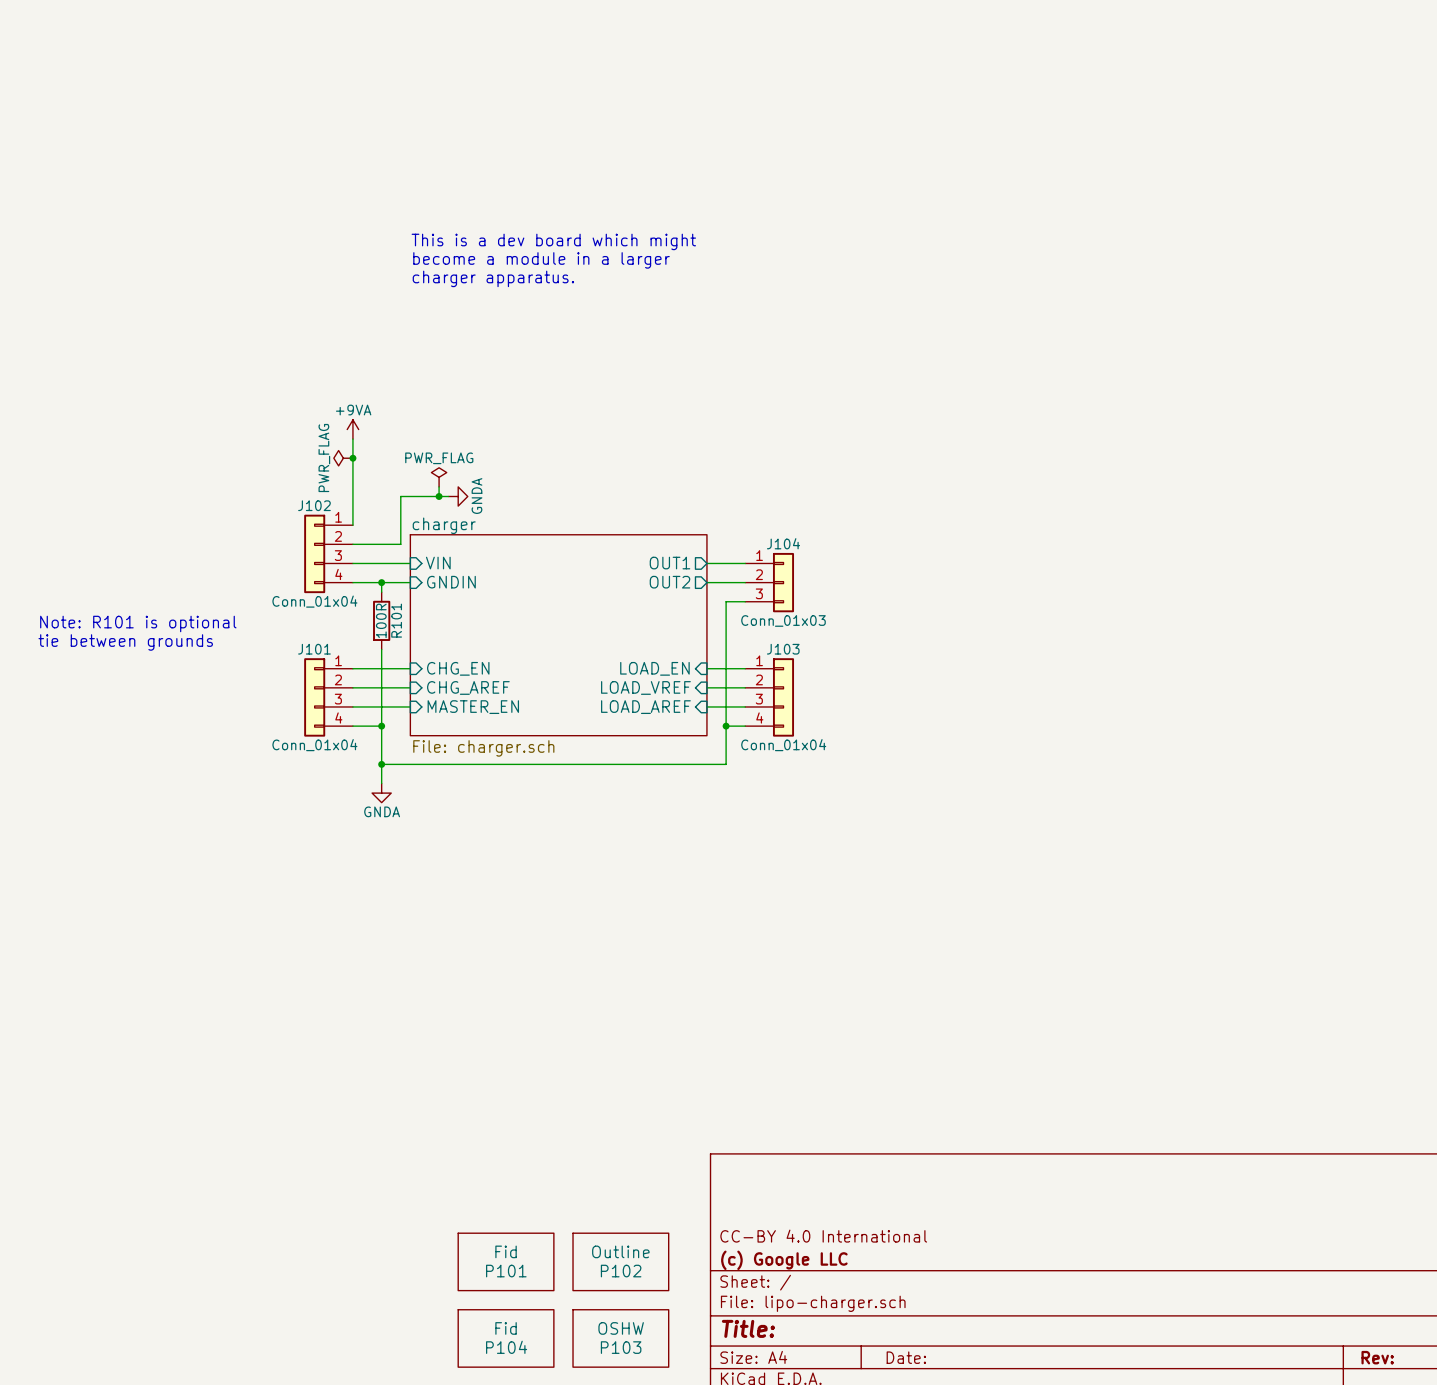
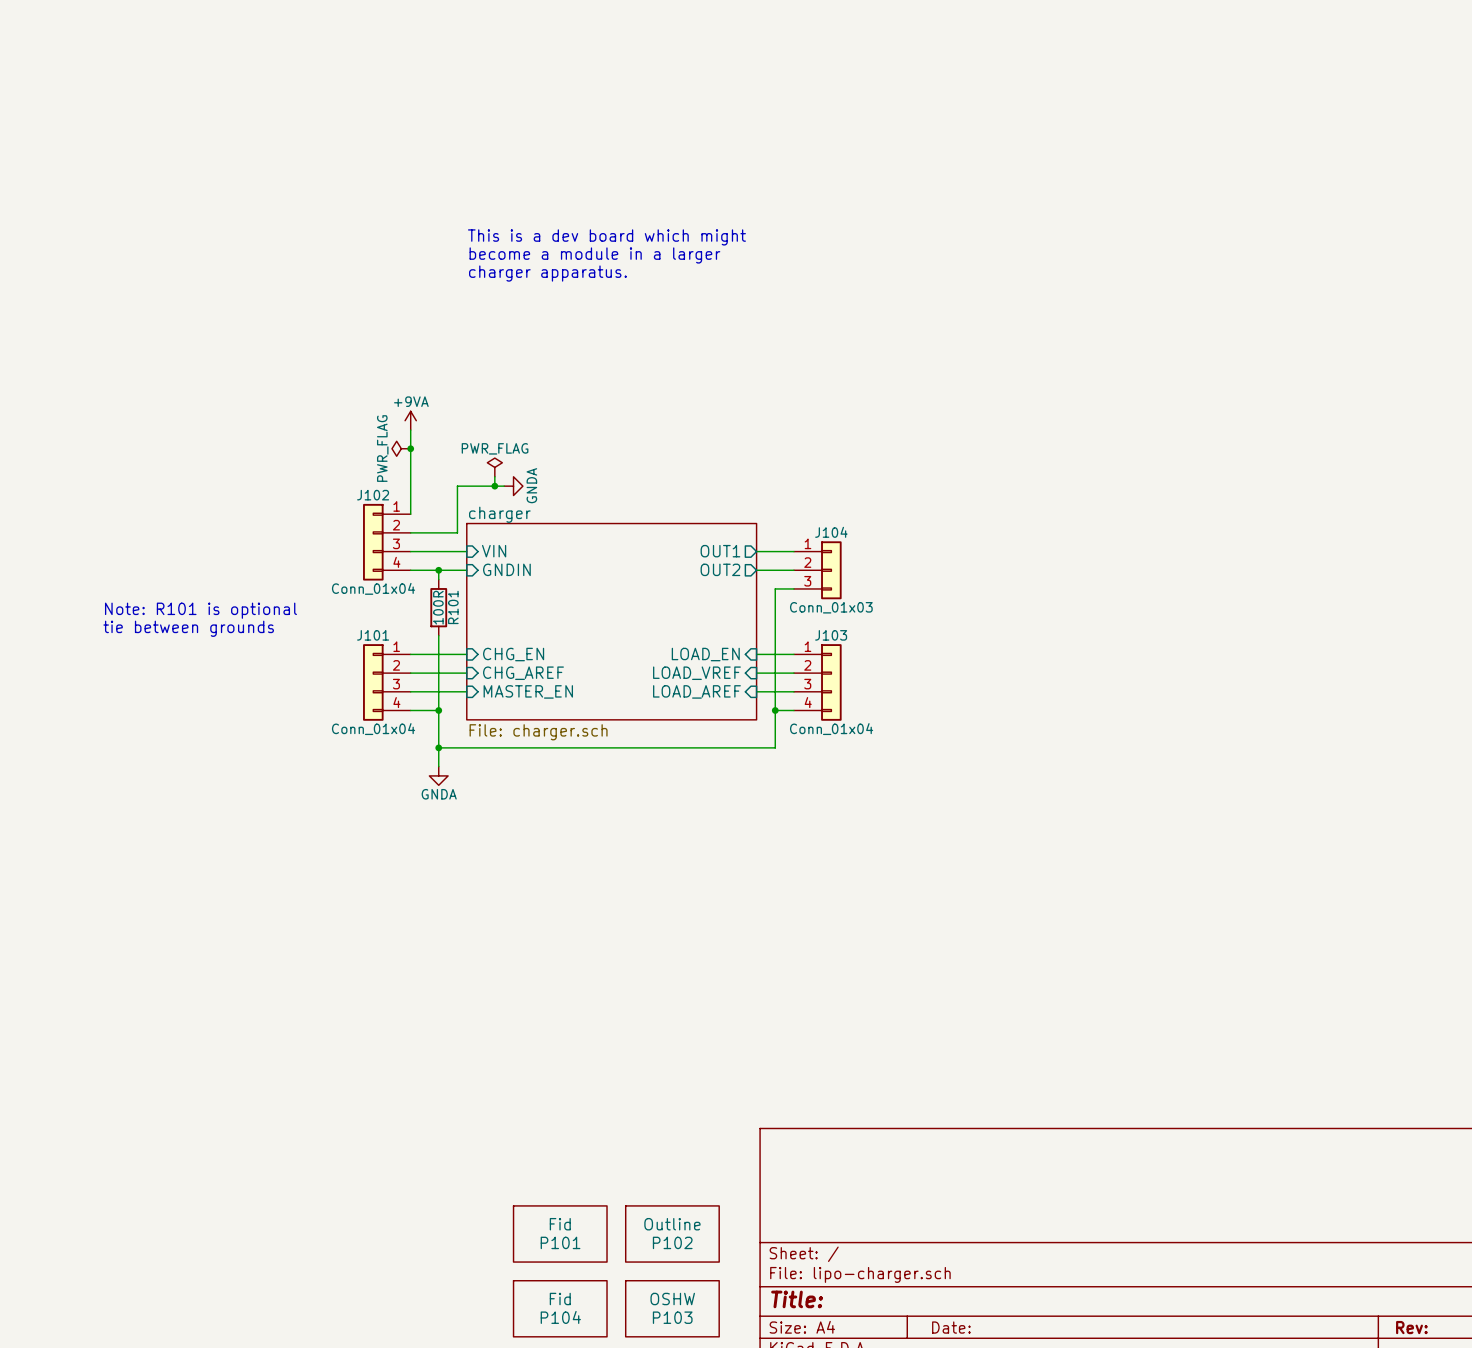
title block: CC-BY 4.0 International (823, 1236) -> none
title block: (c) Google LLC (784, 1260) -> none

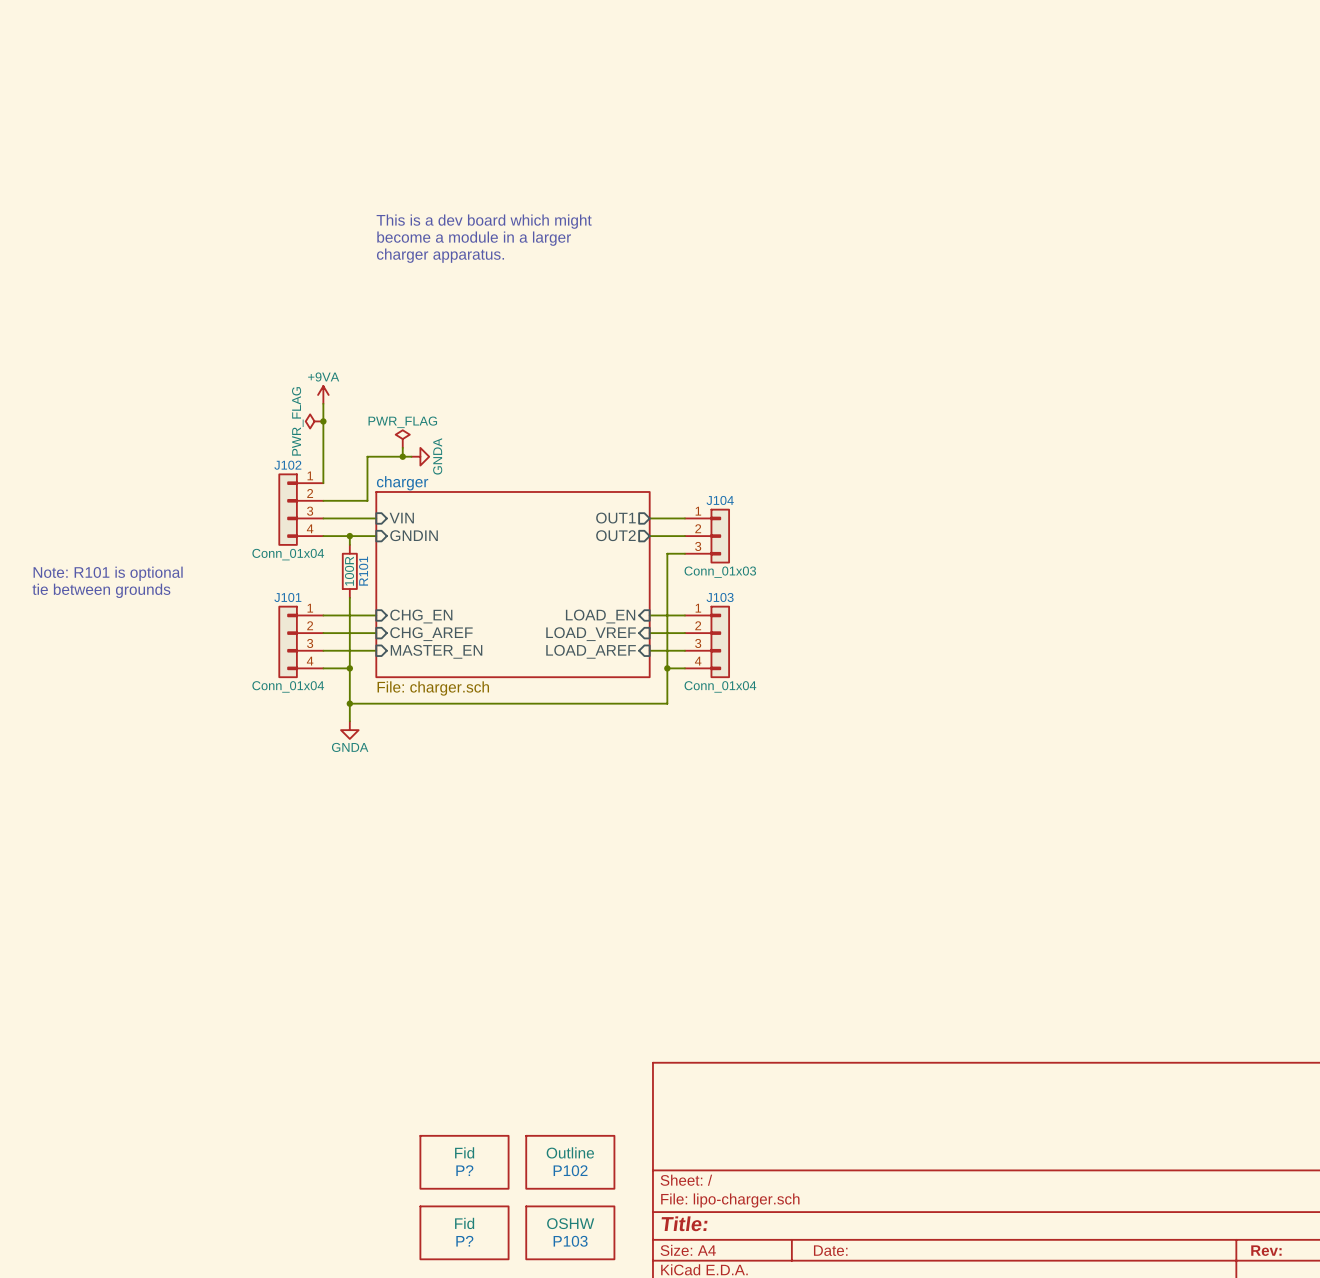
P101 name: P101 (560, 1242) -> P? (464, 1170)
P104 name: P104 (560, 1317) -> P? (464, 1241)

